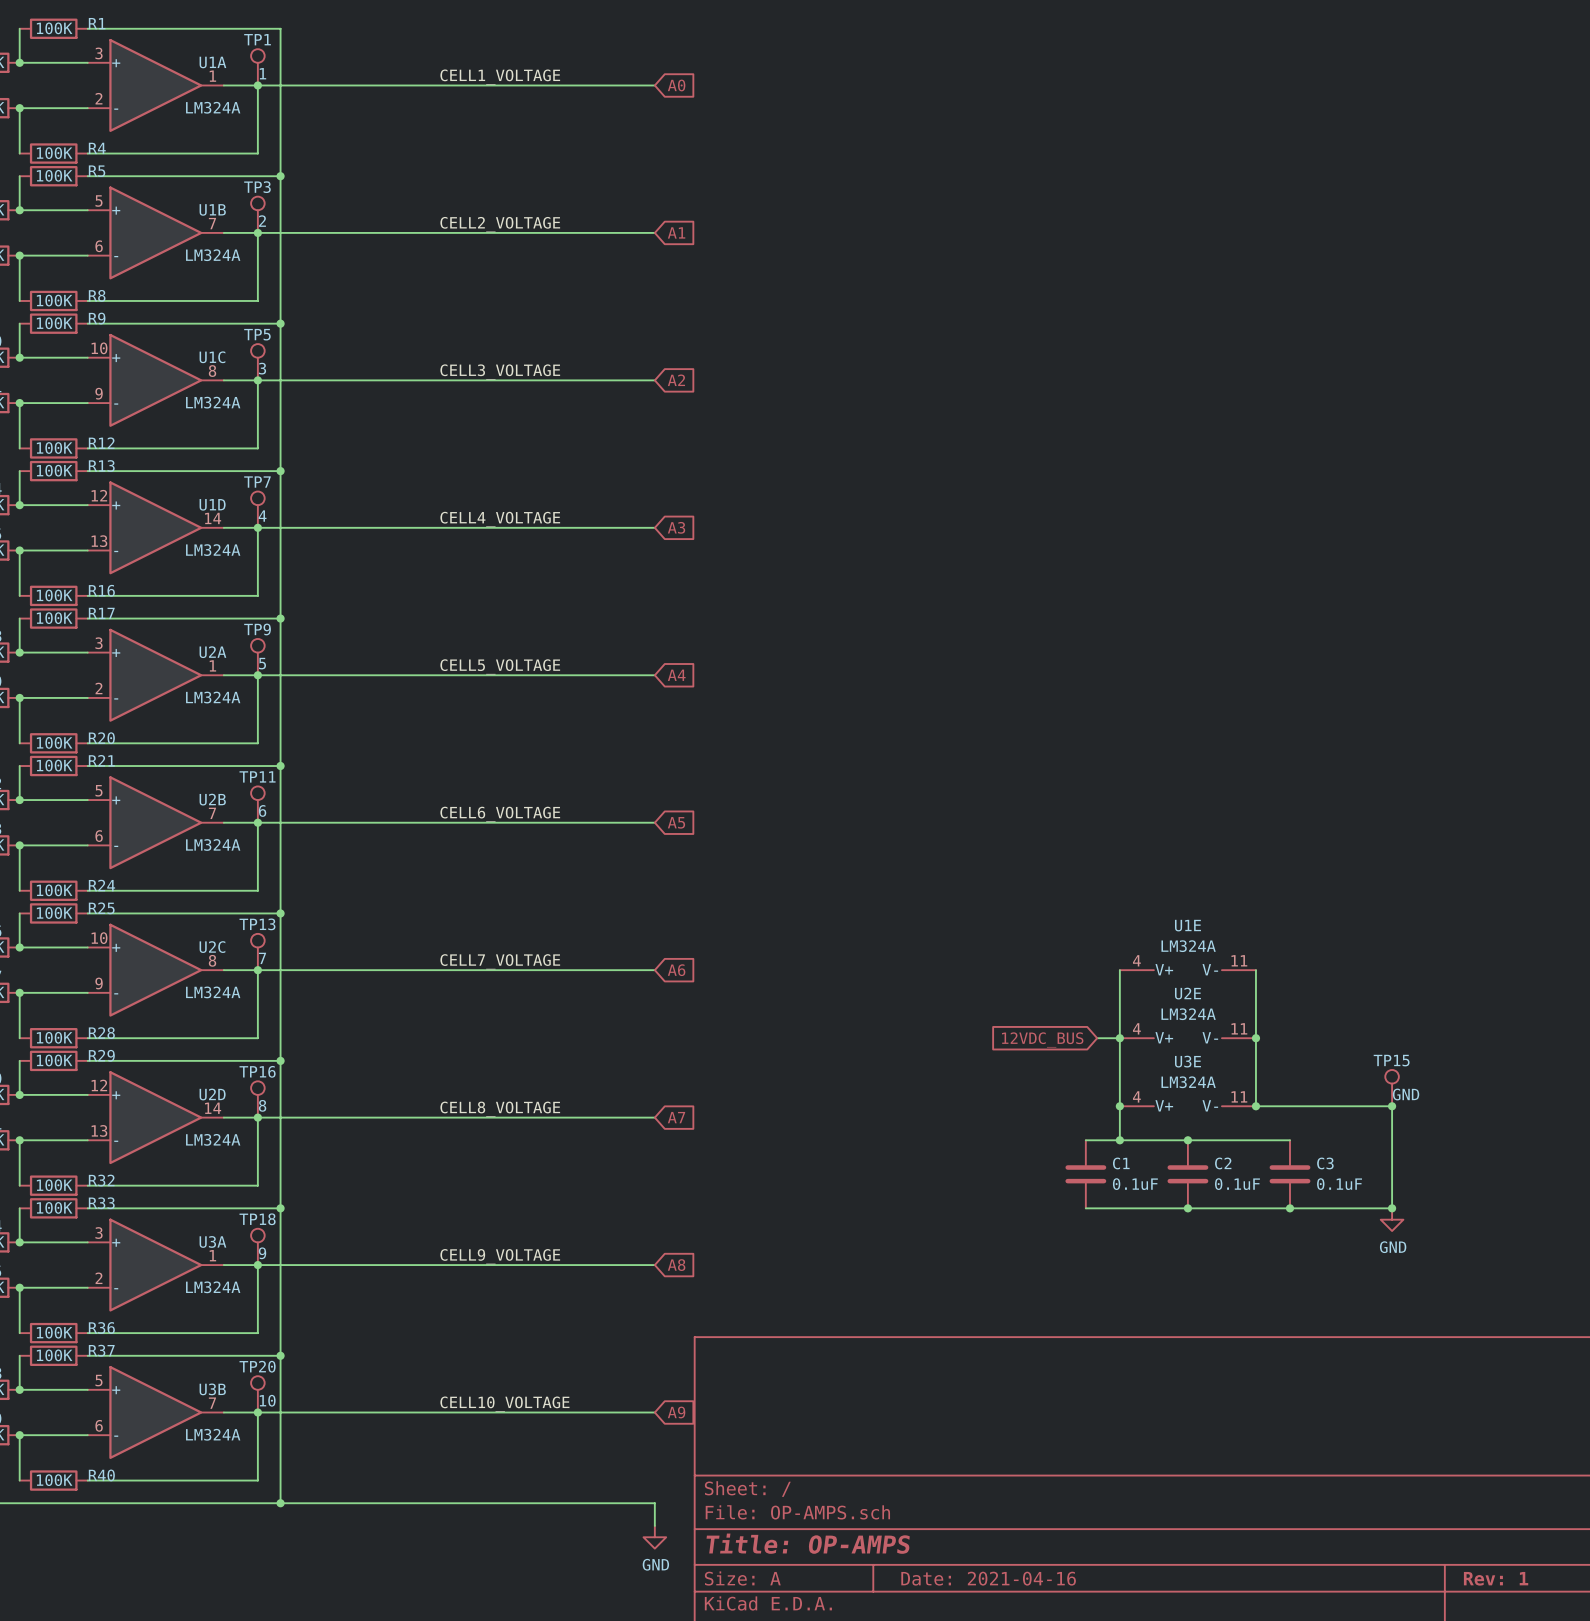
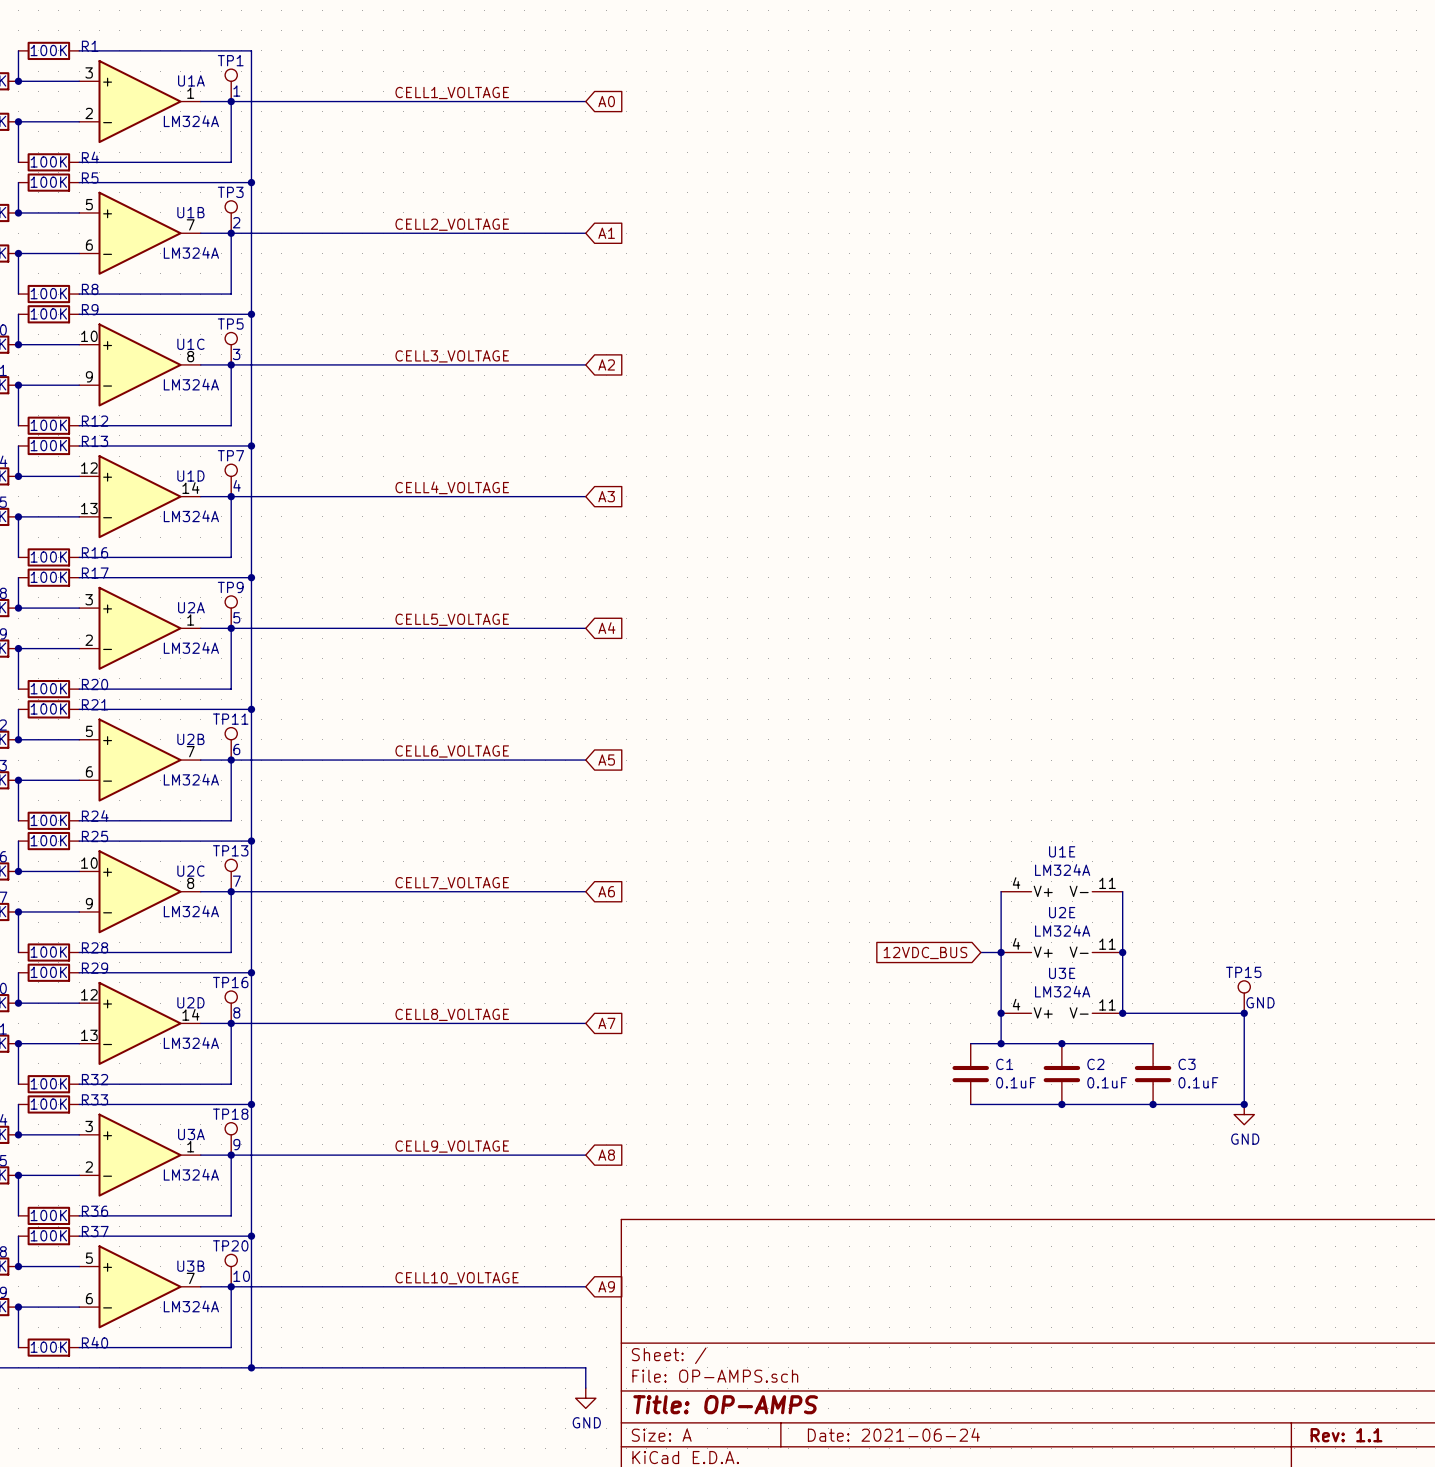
title block: Date: 2021-04-16 (988, 1578) -> Date: 2021-06-24 (893, 1434)
title block: Rev: 1 (1496, 1578) -> Rev: 1.1 (1346, 1435)

